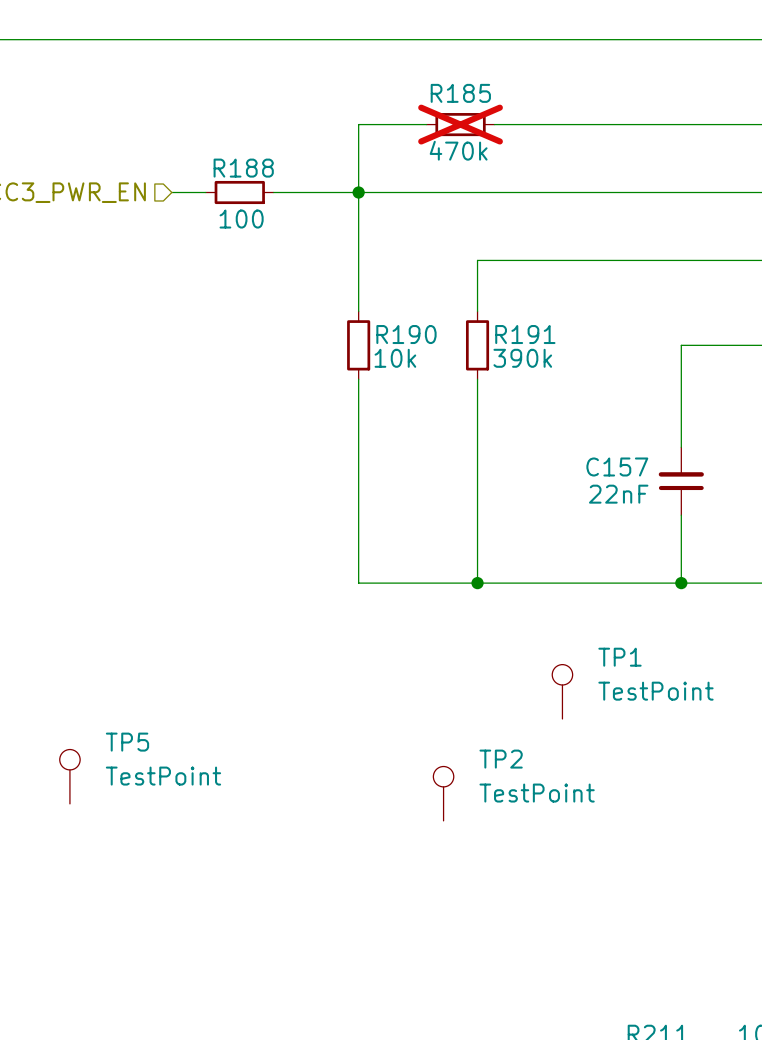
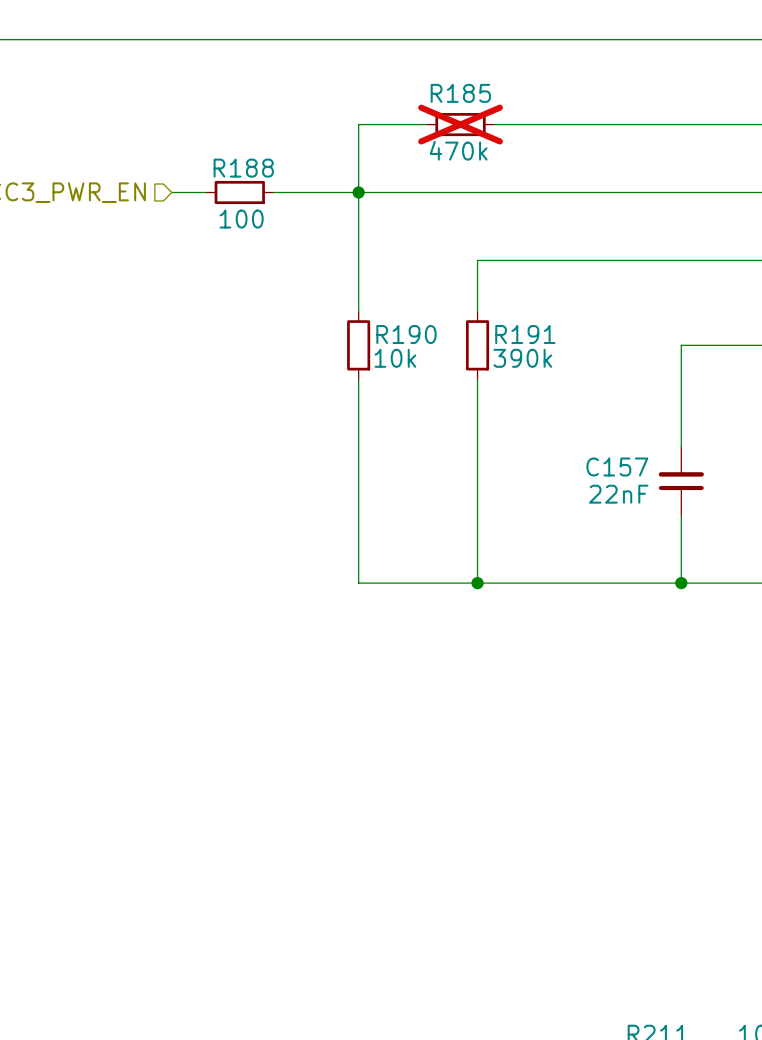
TP1: TestPoint (562, 691) -> none
TP5: TestPoint (69, 776) -> none
TP2: TestPoint (443, 793) -> none

